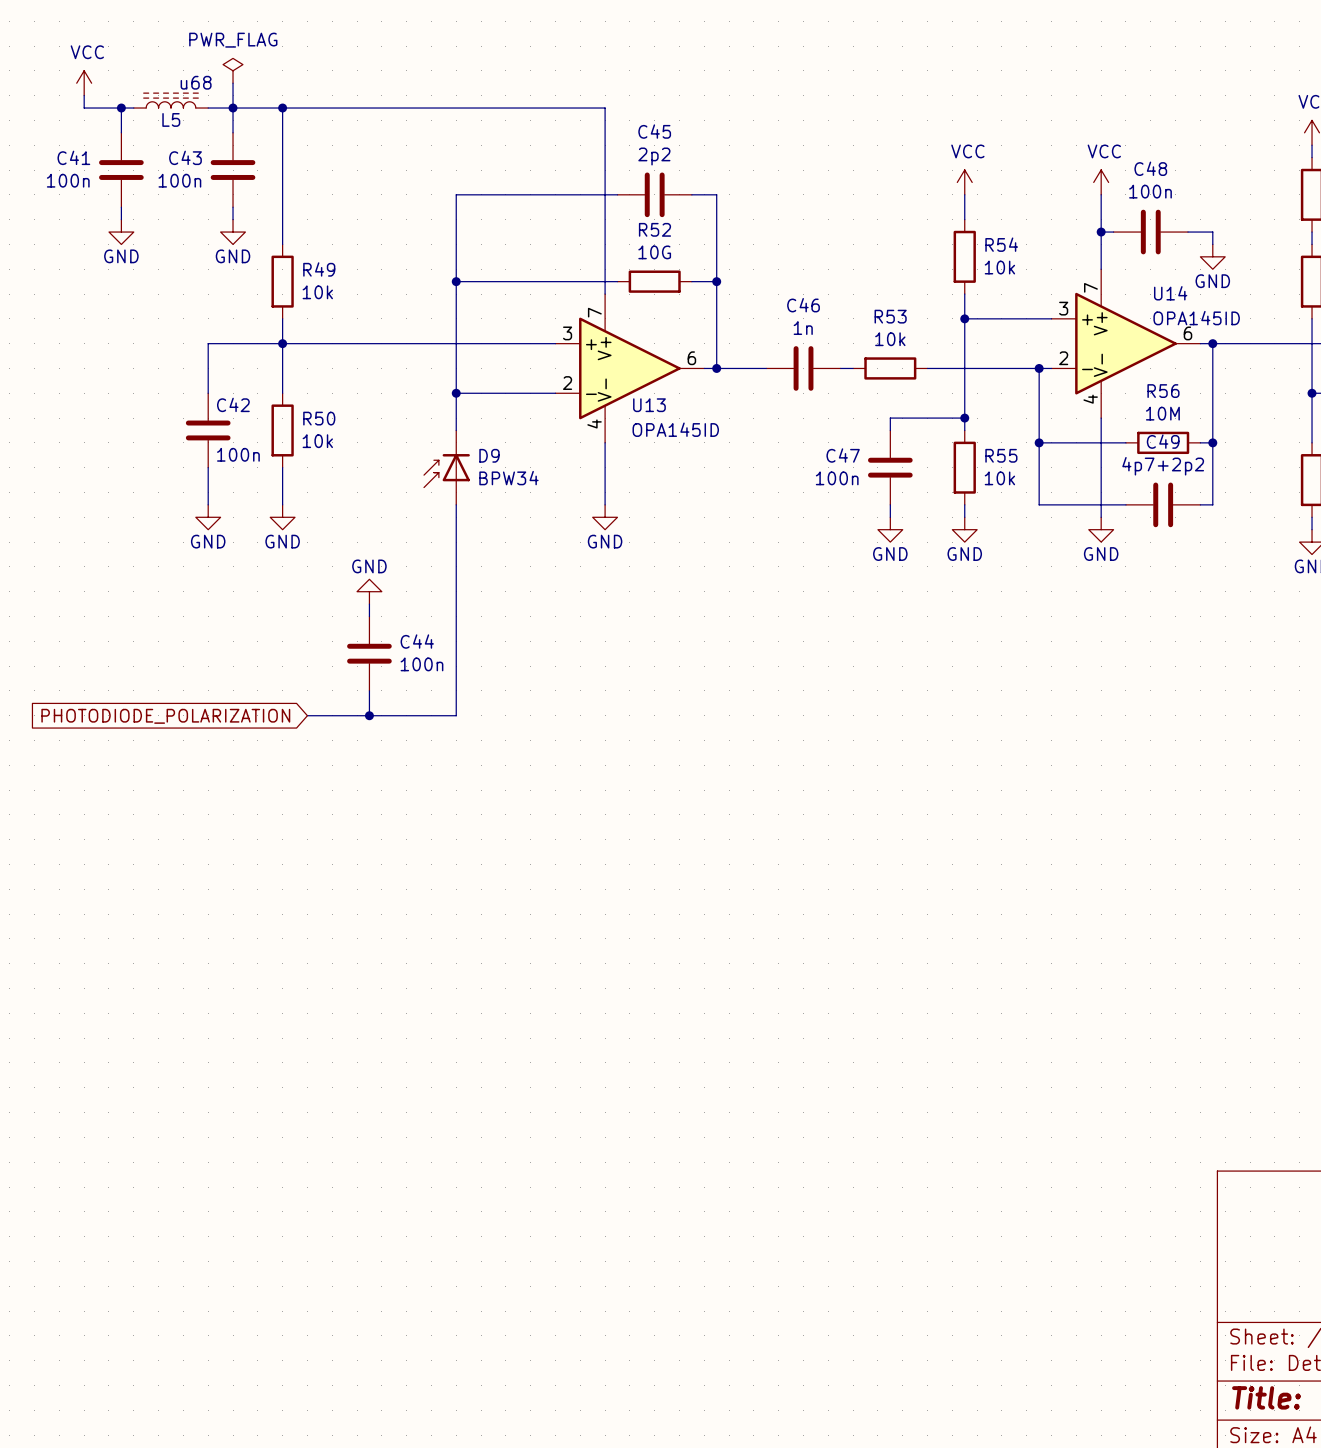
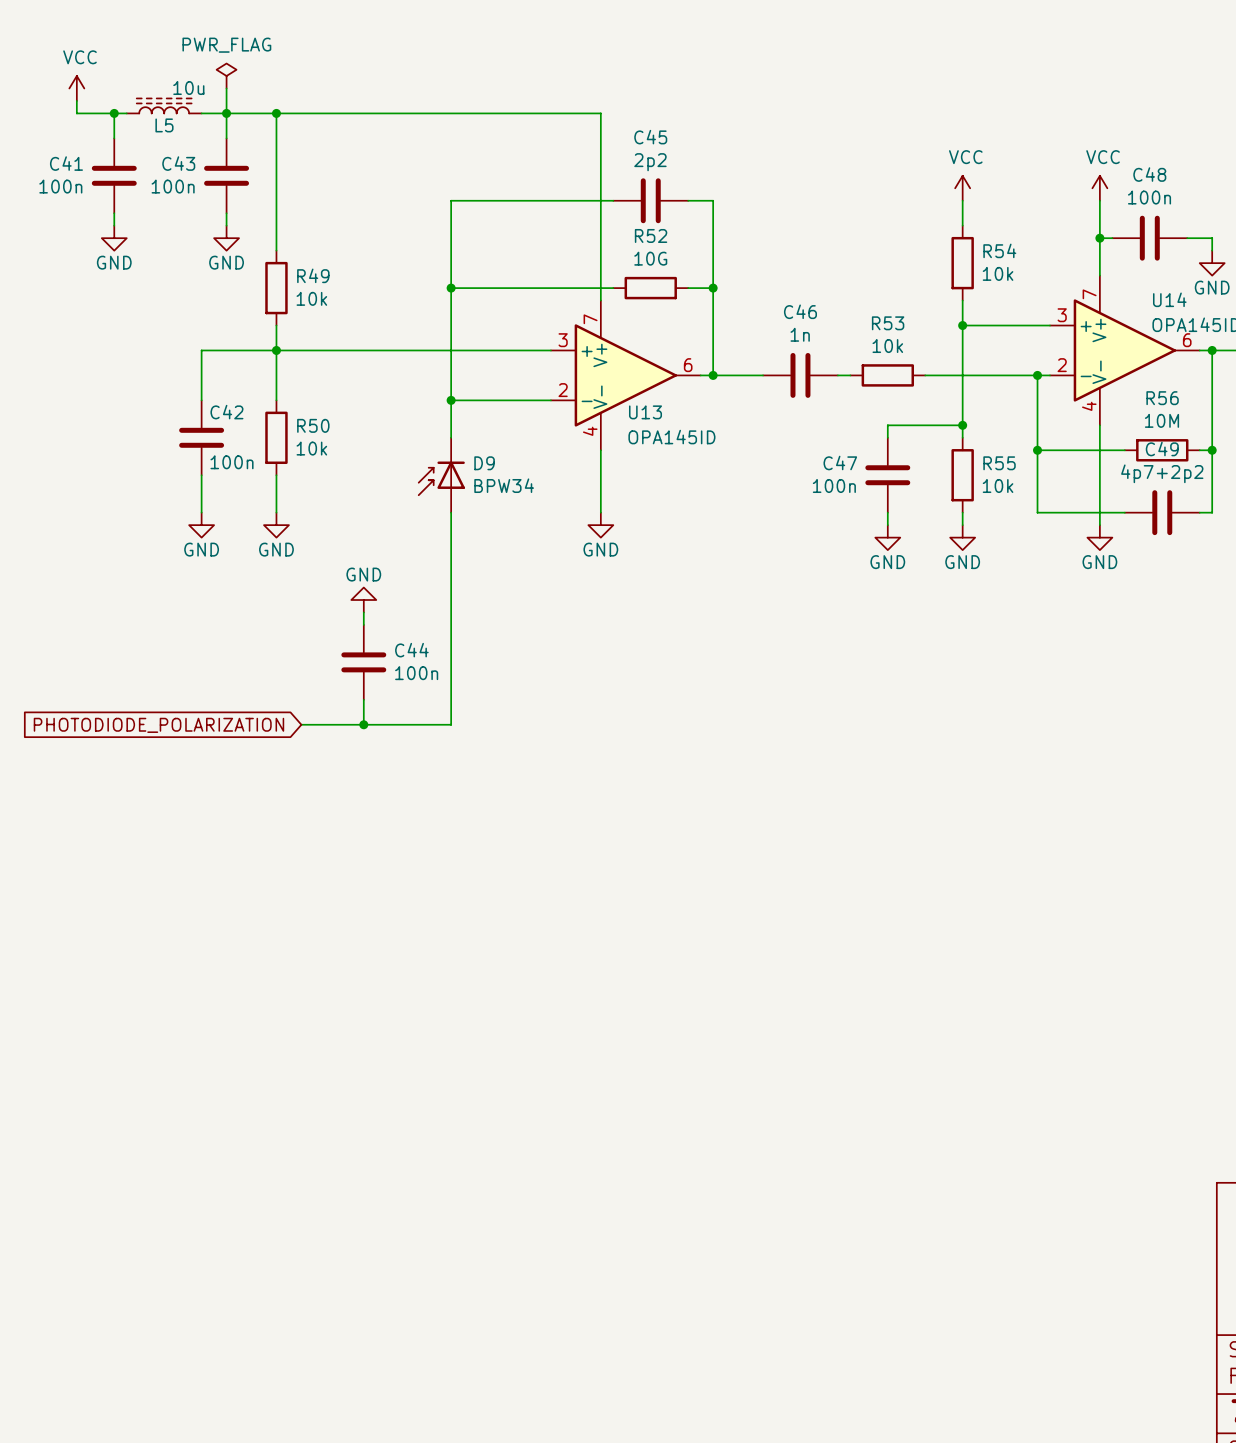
L5 value: u68 (196, 82) -> 10u (188, 88)

